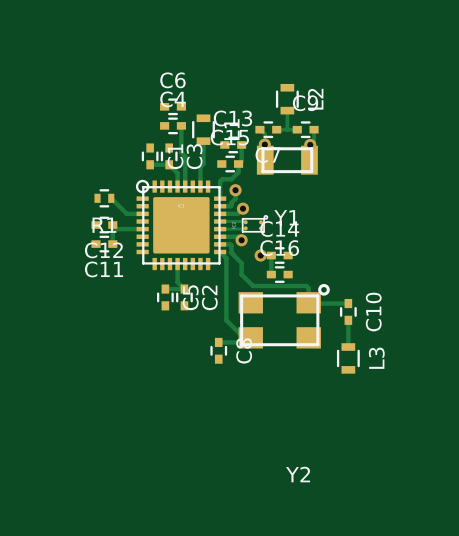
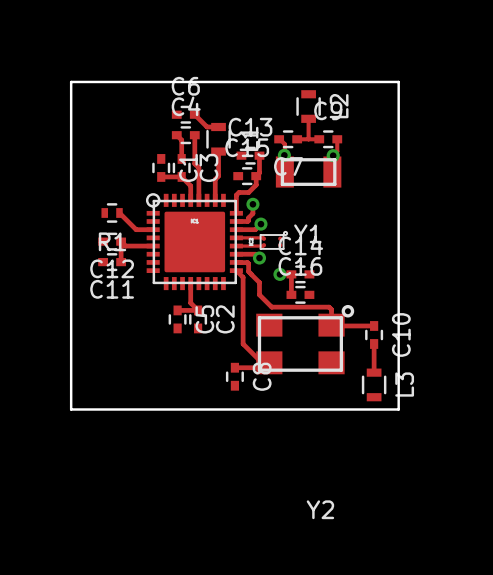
board edge: none -> (71, 81) (71, 409) (398, 409) (398, 81) (71, 81)
track: none -> (194, 114) (207, 127) (218, 127)
track: none -> (176, 135) (181, 140) (181, 158)

